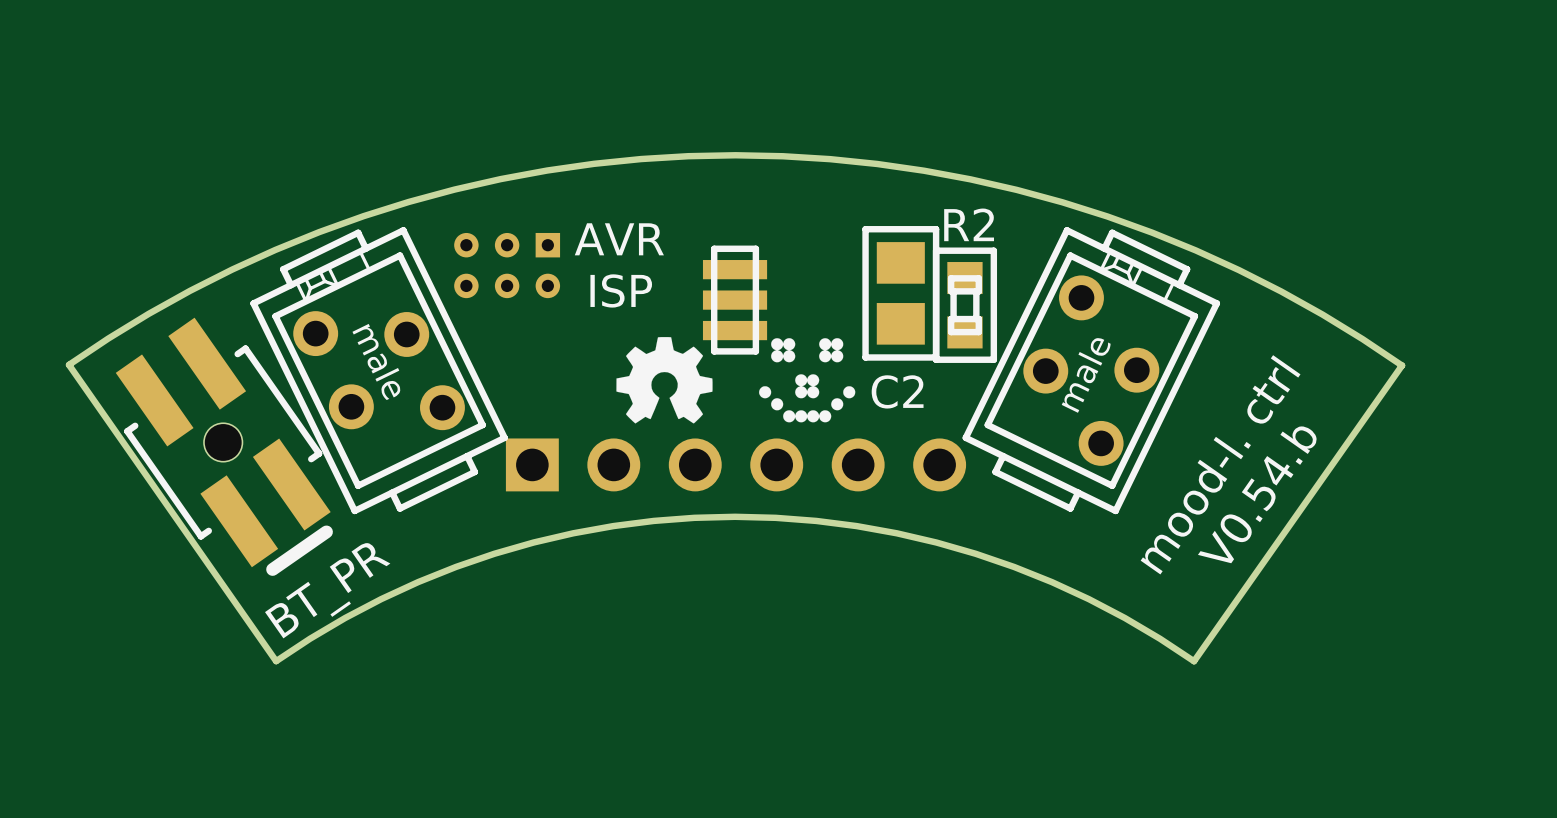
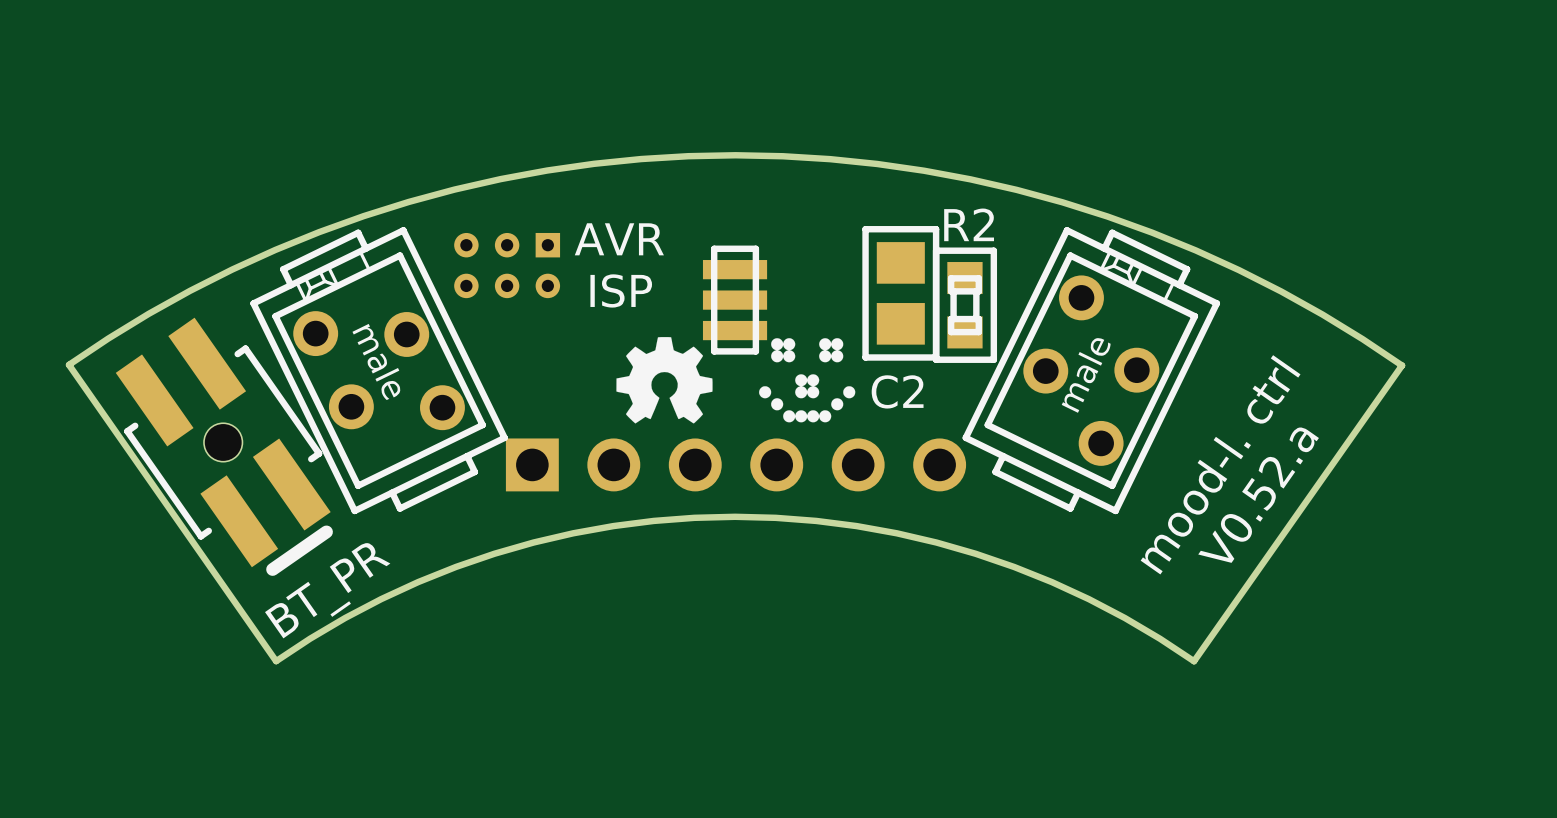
text: V0.54.b (1257, 494) -> V0.52.a (1258, 494)

